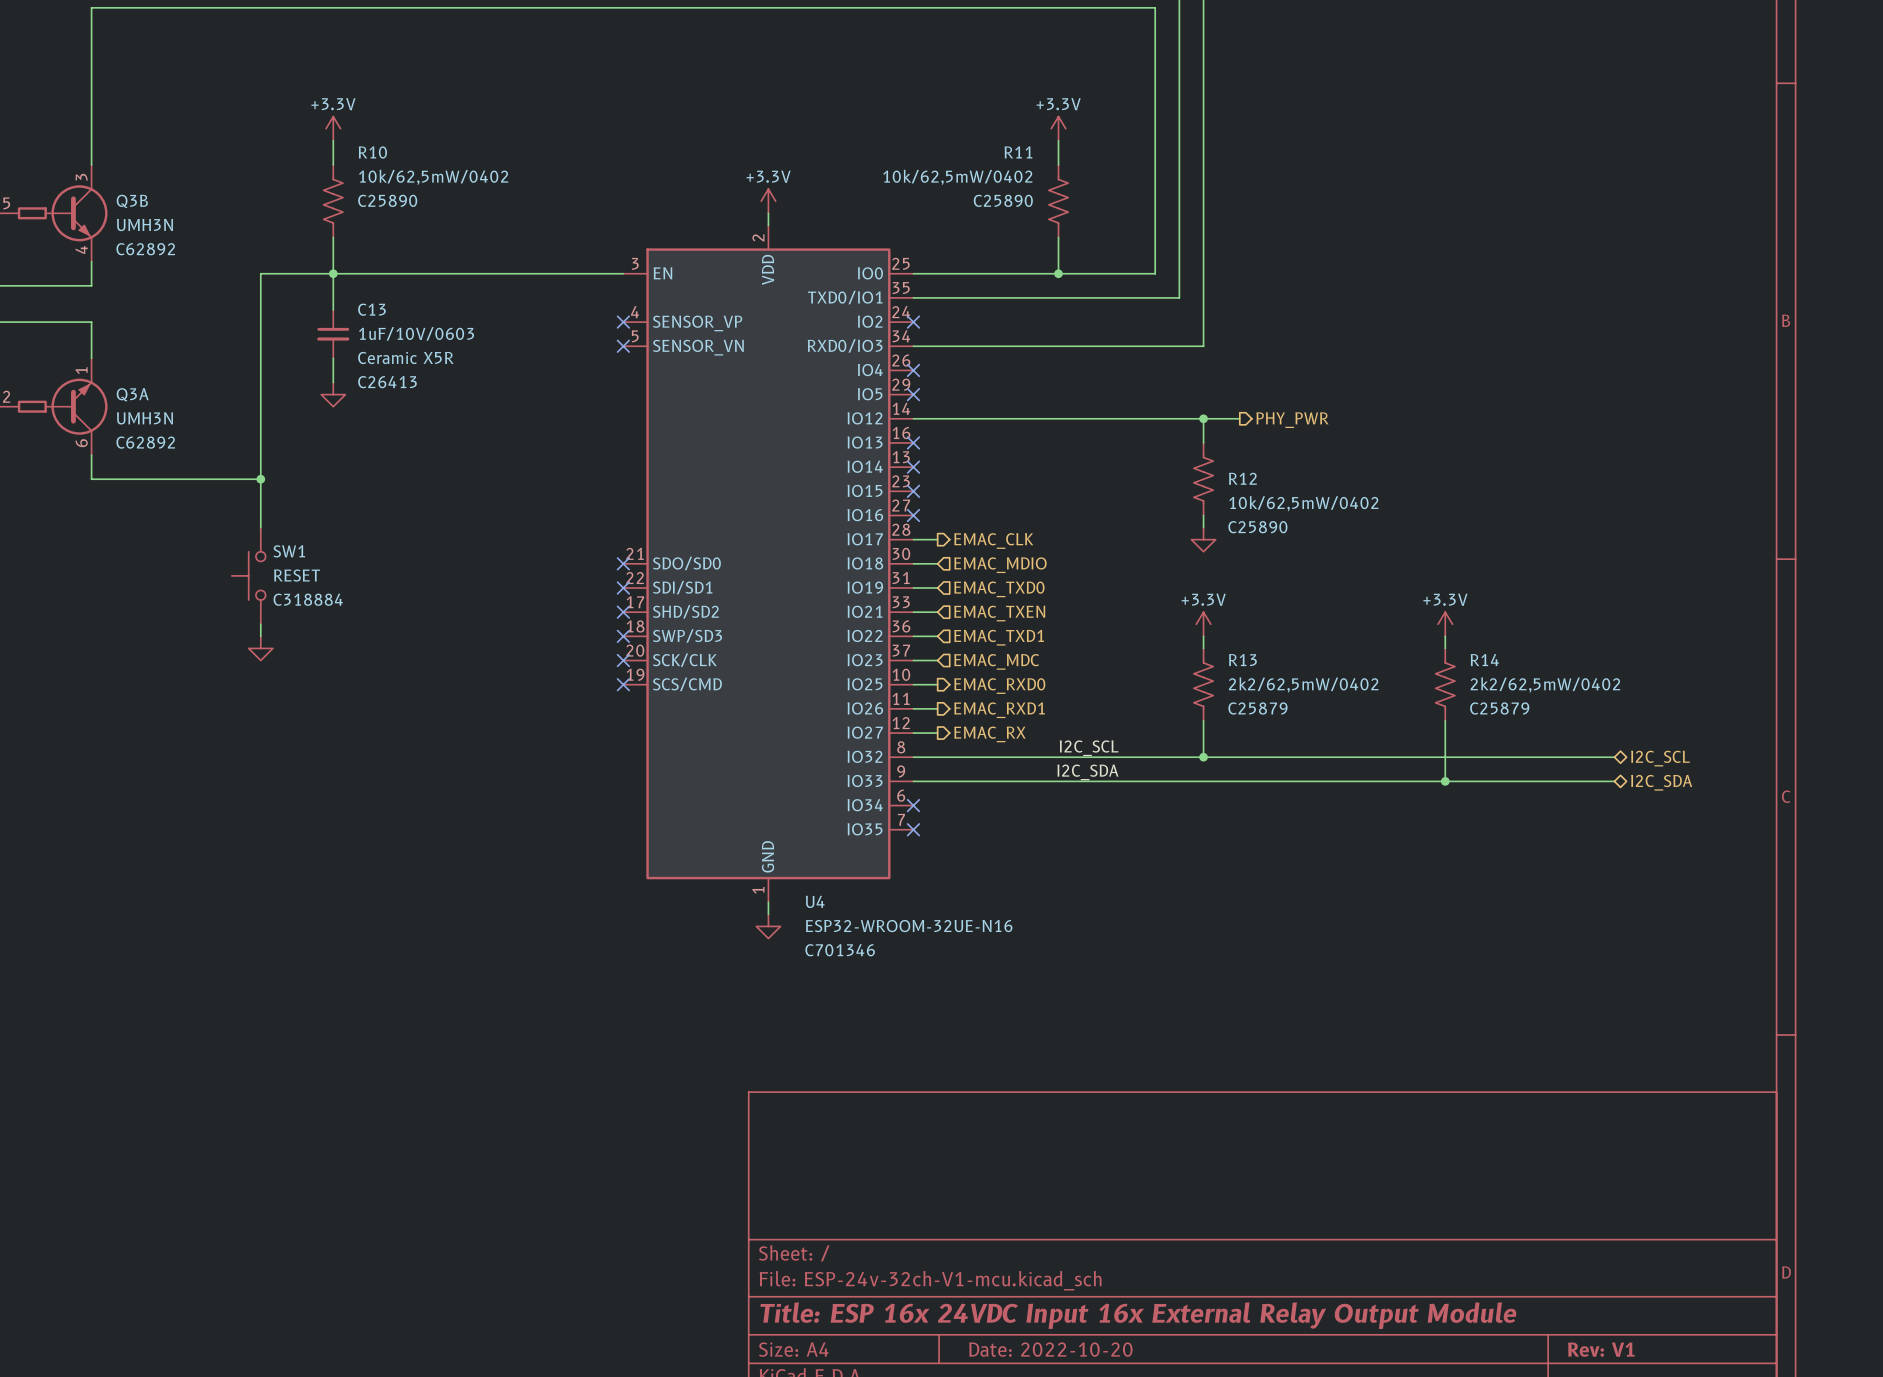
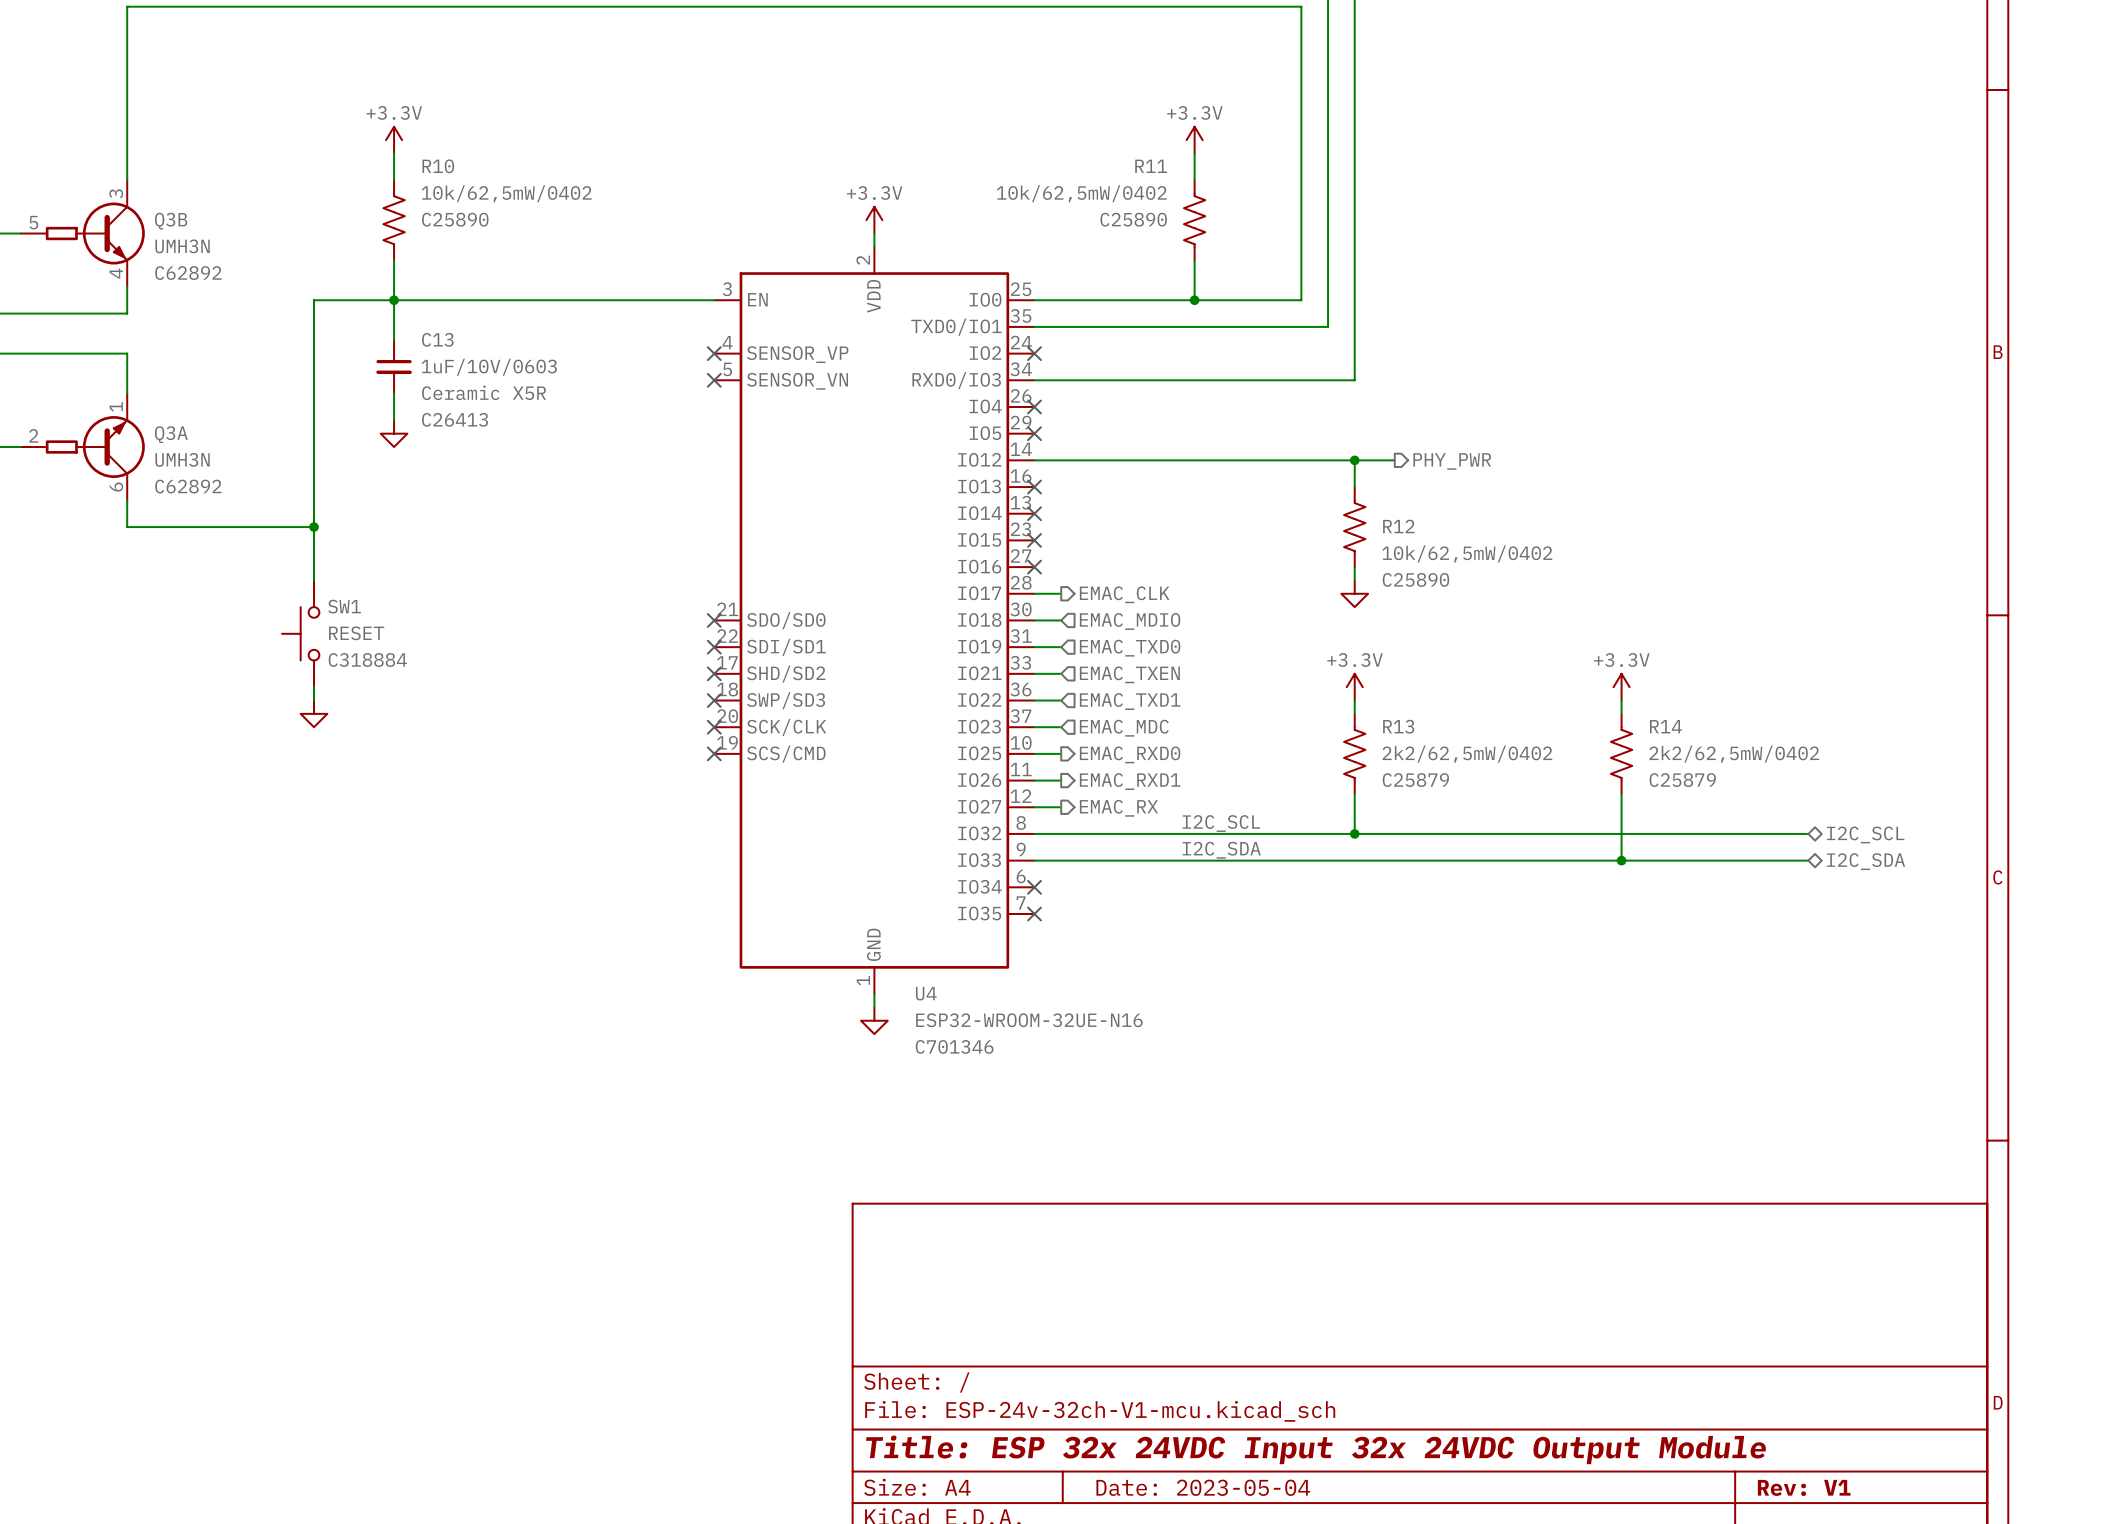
title block: Title: ESP 16x 24VDC Input 16x External Relay Output Module (1138, 1315) -> Title: ESP 32x 24VDC Input 32x 24VDC Output Module (1316, 1449)
title block: Date: 2022-10-20 (1050, 1349) -> Date: 2023-05-04 (1203, 1487)

